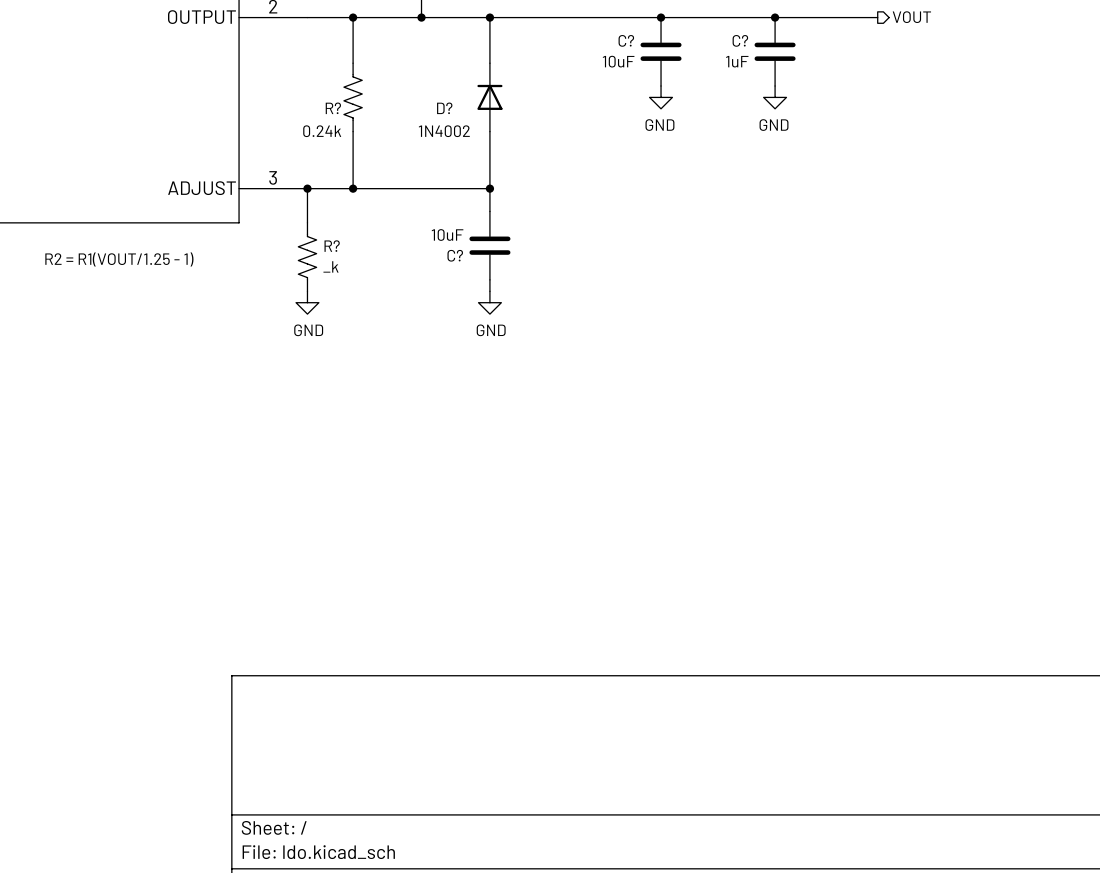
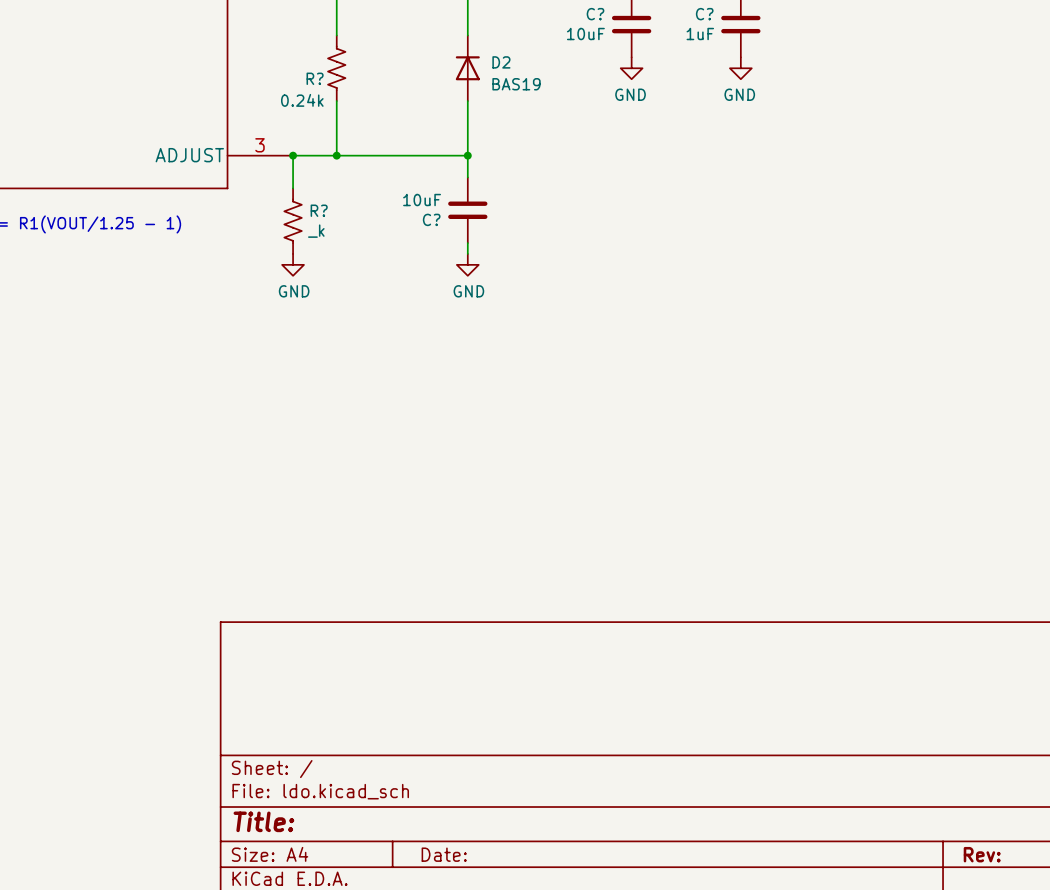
D? name: D? (444, 108) -> D2 (501, 62)
D? value: 1N4002 (444, 131) -> BAS19 (516, 84)

